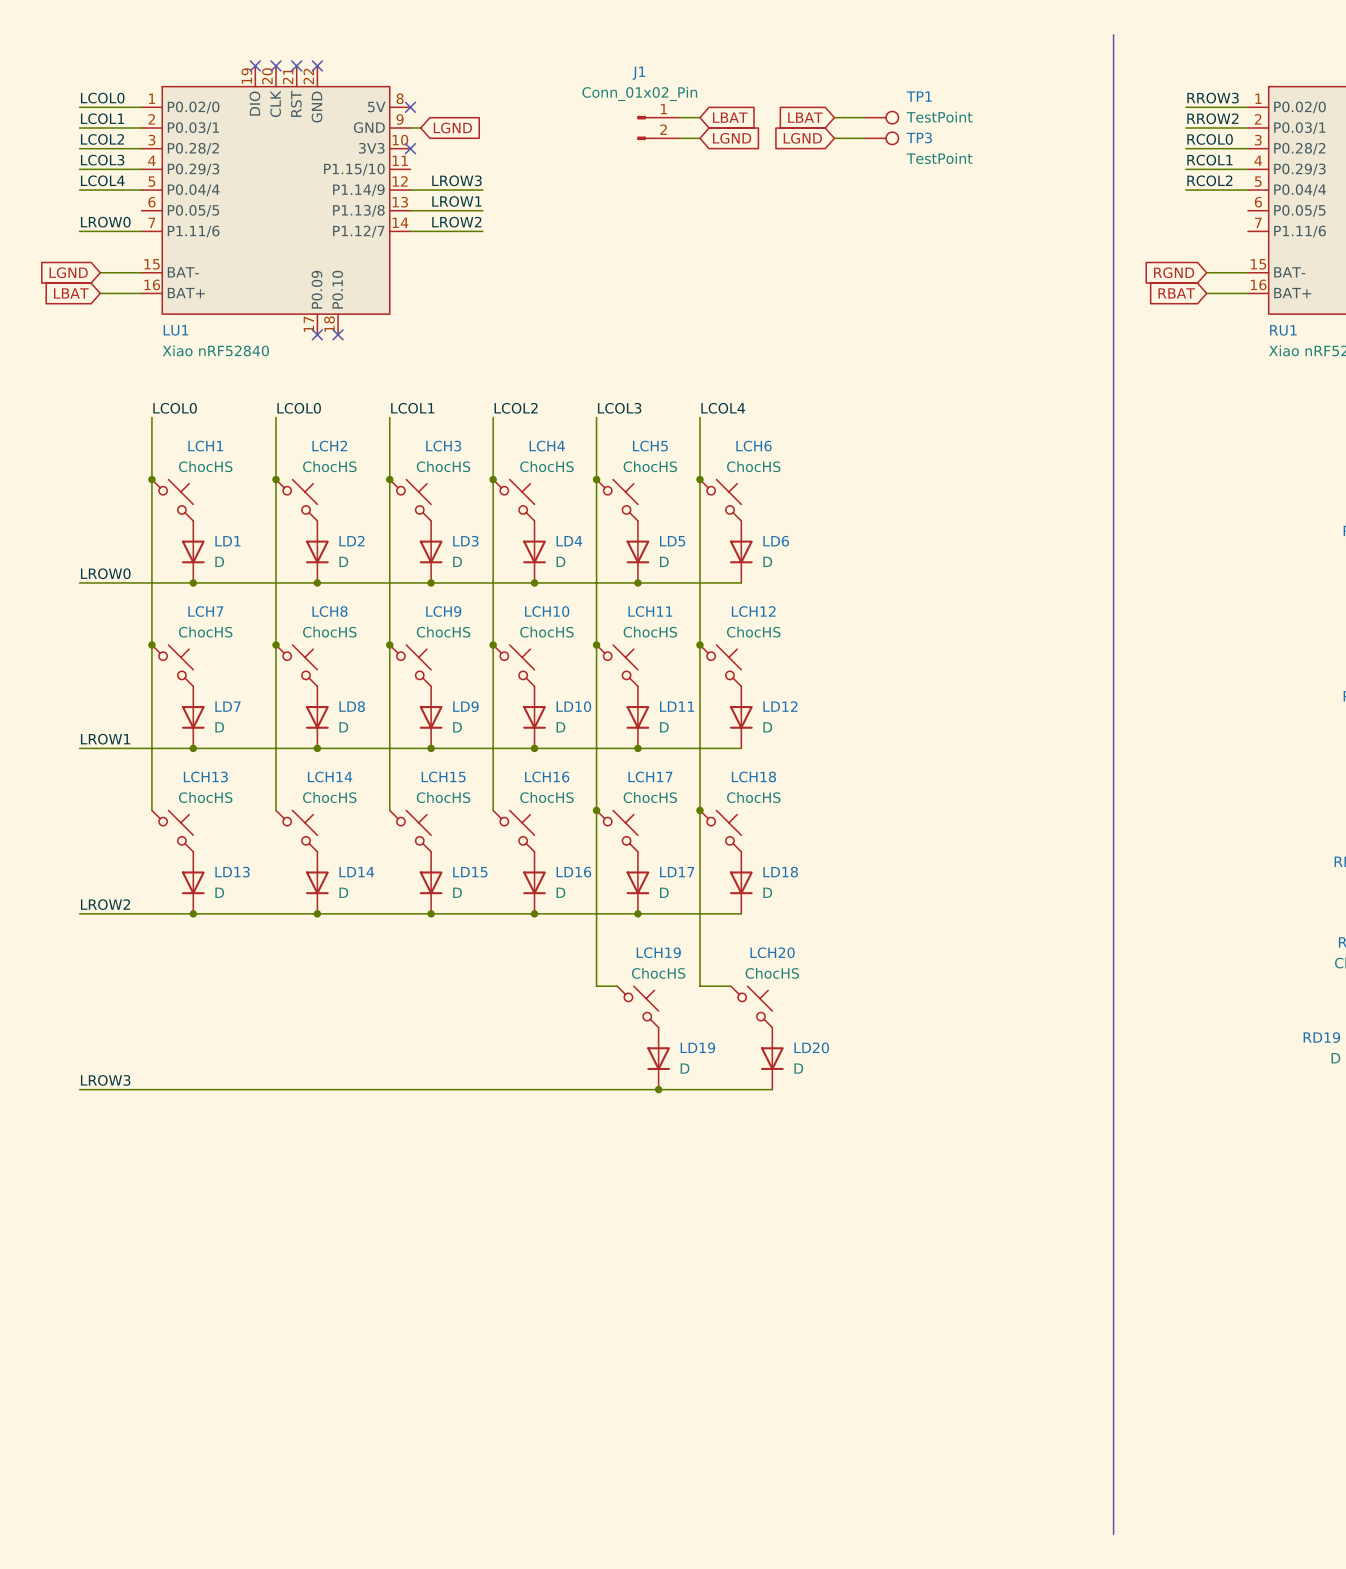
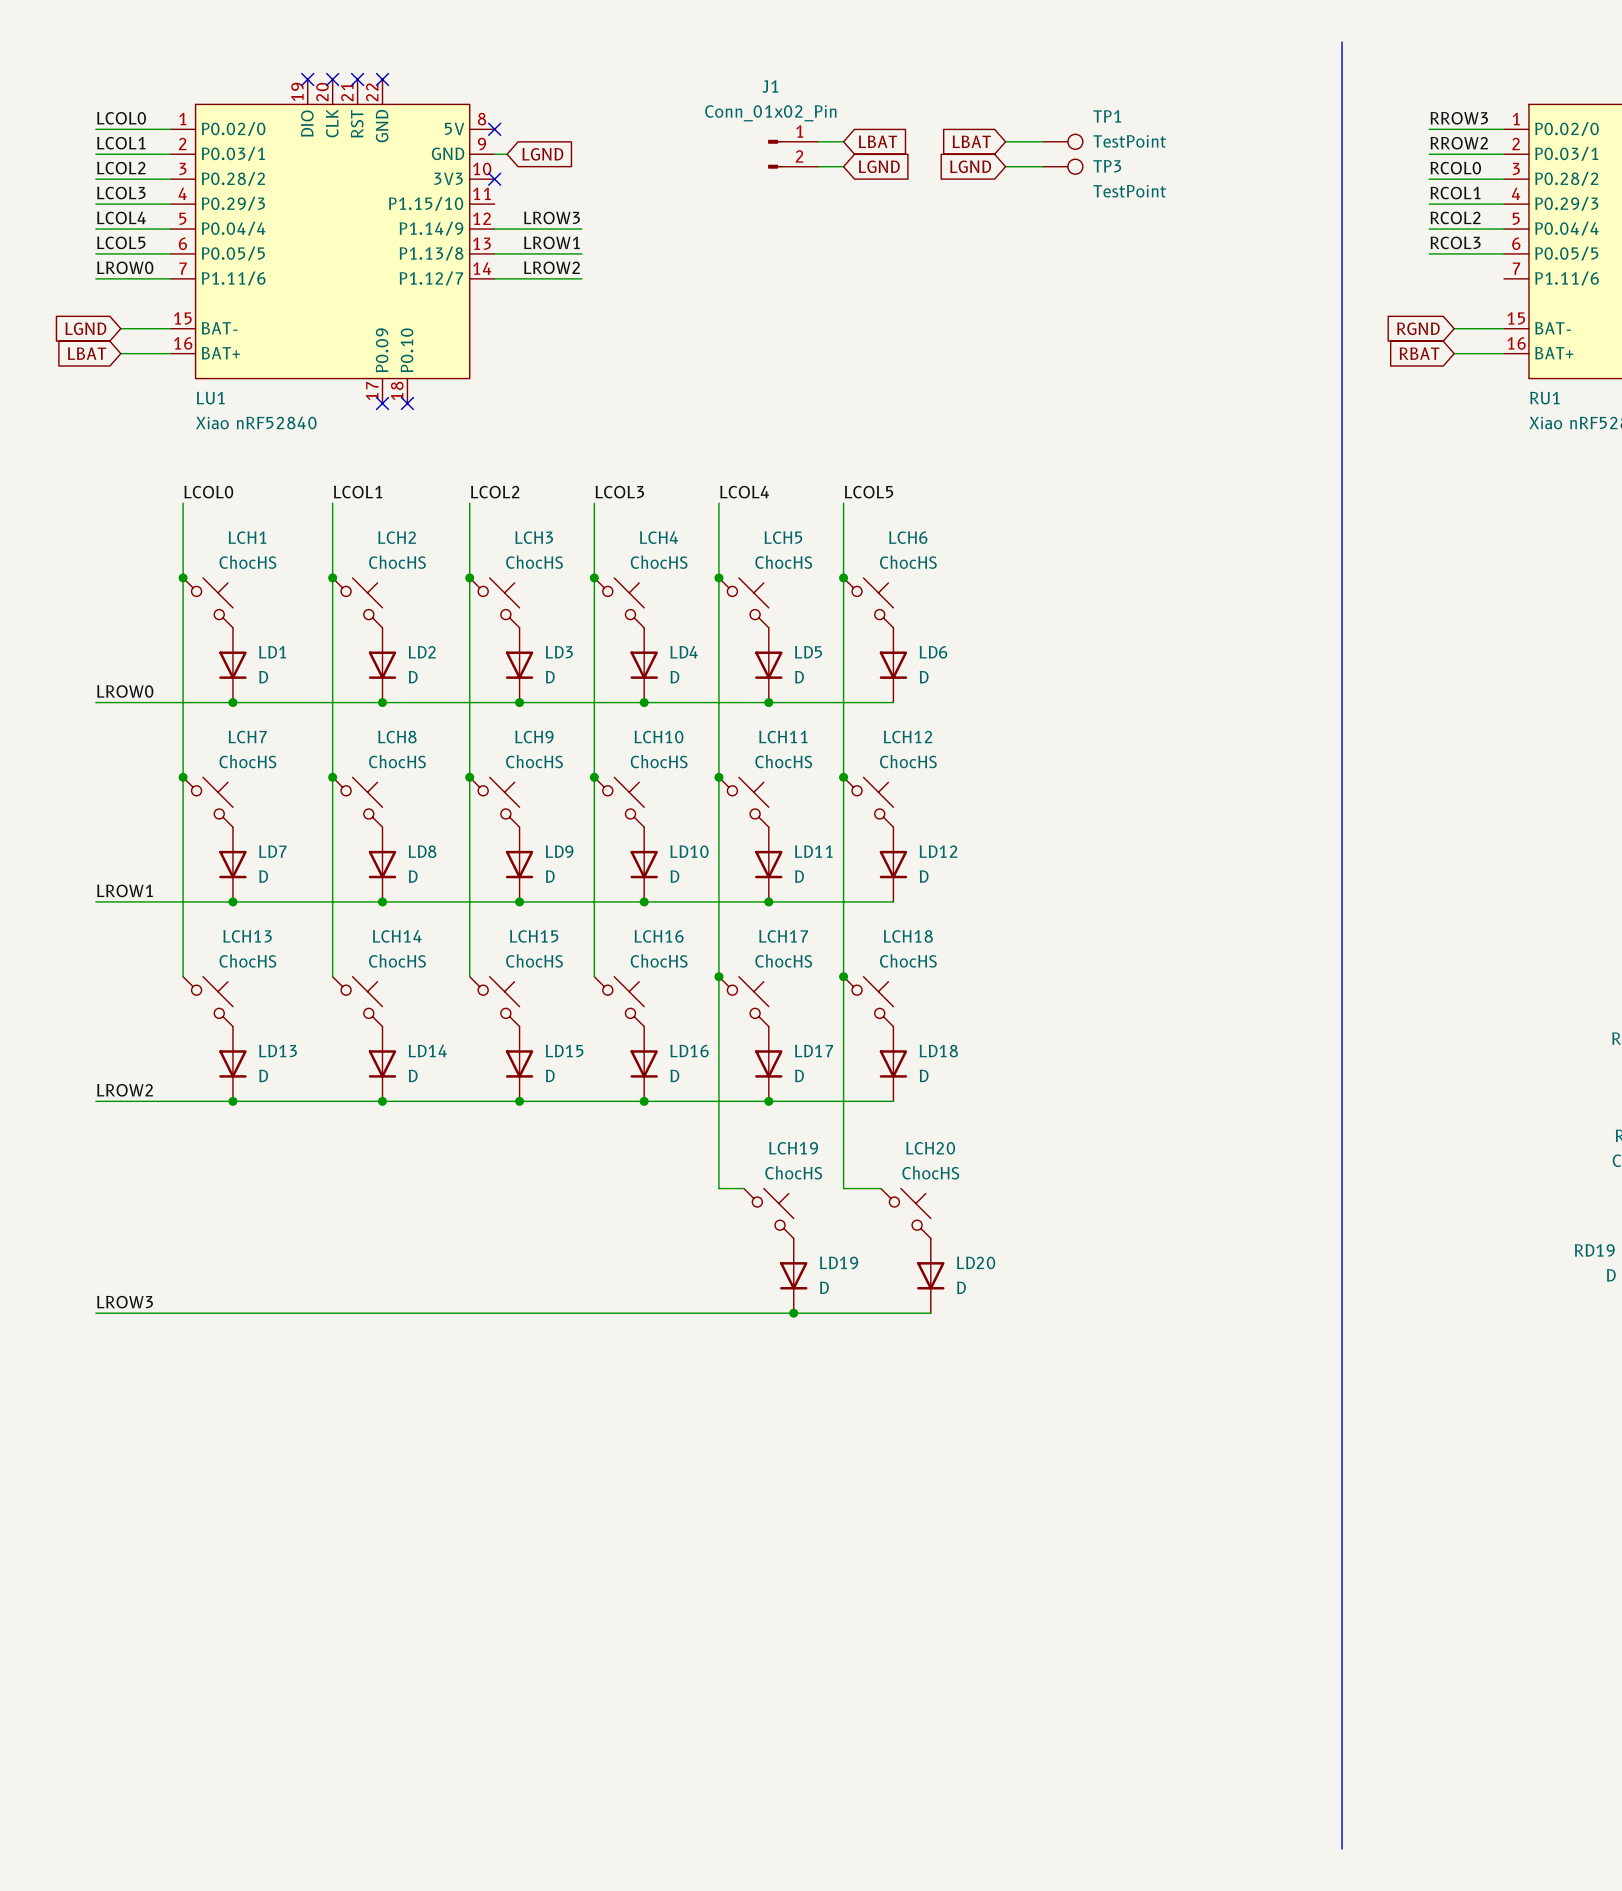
label: none -> LCOL5 (121, 242)
label: none -> RCOL3 (1455, 242)
wire: none -> (95, 253) (170, 253)
wire: none -> (1429, 253) (1504, 253)
label: LCOL0 (299, 408) -> LCOL1 (358, 492)
label: LCOL1 (412, 408) -> LCOL2 (495, 492)
label: LCOL2 (516, 408) -> LCOL3 (619, 492)
label: LCOL3 (619, 408) -> LCOL4 (744, 492)
label: LCOL4 (723, 408) -> LCOL5 (869, 492)

